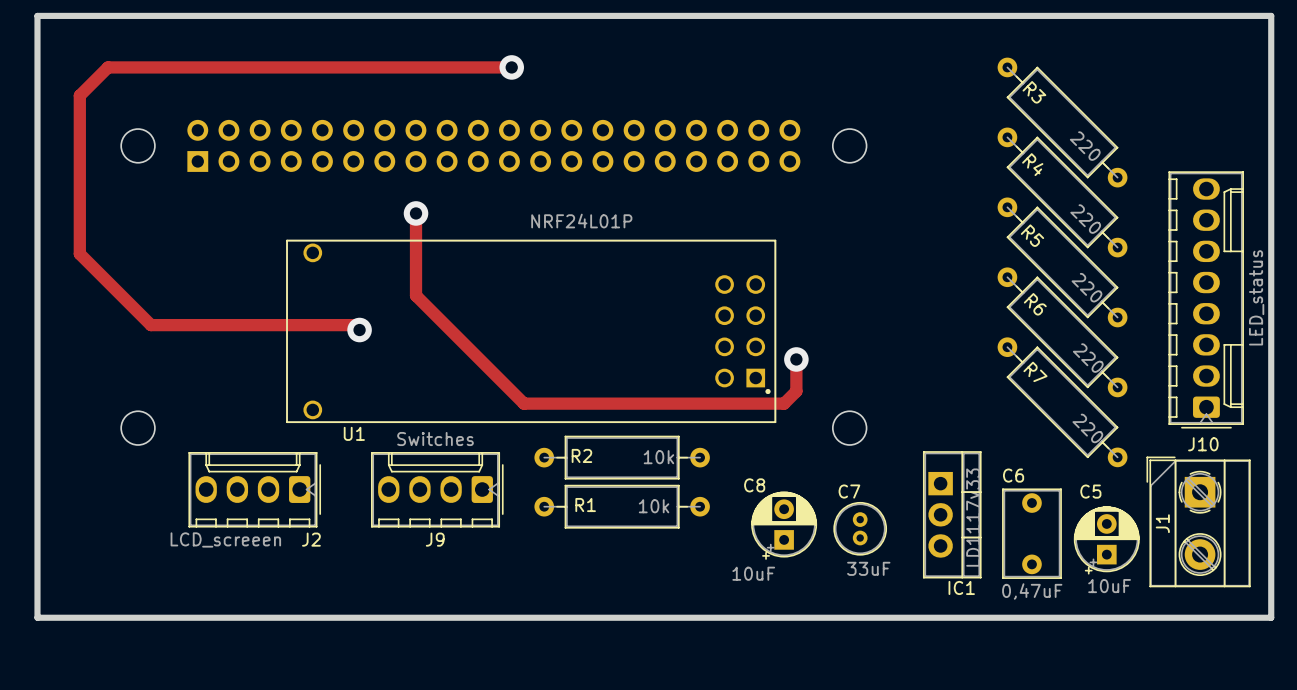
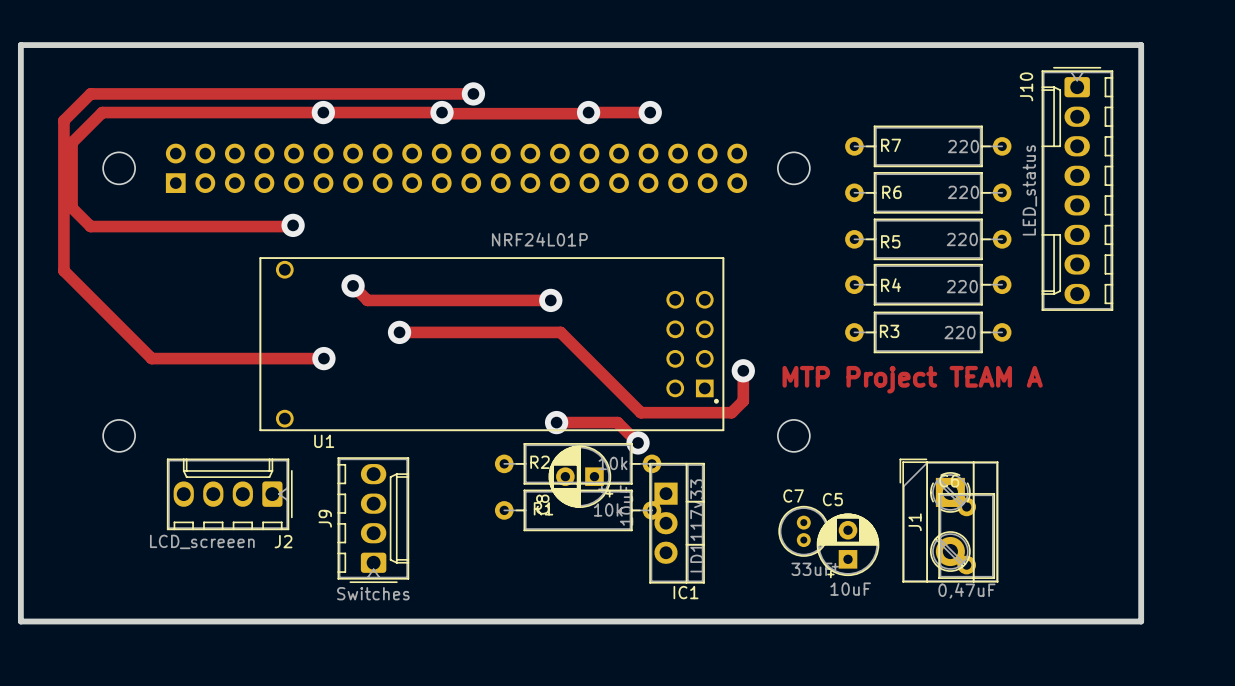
board edge: (37, 15) (37, 617) (1271, 617) (1271, 15) (1216, 15) -> (23, 45) (20, 45) (20, 621) (1141, 621) (1141, 45)
via: none -> (323, 112)
via: none -> (442, 112)
via: none -> (588, 112)
track: none -> (650, 112) (102, 112) (72, 142) (72, 207) (90, 226) (293, 225)
via: none -> (650, 112)
R3 rotation: 0° (1062, 122) -> 45° counterclockwise (928, 332)
R3 position: (1062, 122) -> (928, 332)
R4 rotation: 0° (1062, 192) -> 45° counterclockwise (928, 284)
R4 position: (1062, 192) -> (928, 284)
via: none -> (293, 225)
track: (416, 213) (416, 295) (523, 403) (688, 403) -> (399, 332) (560, 332) (640, 412)
via: (416, 213) -> none
R5 rotation: 0° (1062, 262) -> 45° counterclockwise (928, 239)
R5 position: (1062, 262) -> (928, 239)
track: none -> (353, 285) (367, 300) (550, 300)
via: none -> (353, 285)
via: none -> (550, 300)
J10 rotation: 0° (1206, 299) -> 180° (1077, 188)
via: none -> (399, 332)
track: (150, 325) (354, 325) (359, 330) -> (131, 338) (151, 358) (323, 358)
via position: (359, 330) -> (323, 358)
R6 rotation: 0° (1062, 332) -> 45° counterclockwise (928, 192)
R6 position: (1062, 332) -> (928, 192)
text: none -> MTP Project TEAM A (912, 379)
R7 rotation: 0° (1062, 402) -> 45° counterclockwise (928, 146)
R7 position: (1062, 402) -> (928, 146)
track: none -> (556, 422) (617, 422) (638, 442)
via: none -> (556, 422)
via: none -> (638, 442)
J9 value position: Switches (435, 439) -> Switches (373, 593)
J10 name position: J10 (1203, 444) -> J10 (1026, 86)
J9 rotation: 0° (437, 489) -> 90° clockwise (373, 520)
IC1 position: (952, 514) -> (677, 523)
J1 position: (1198, 521) -> (948, 520)
C8 rotation: 0° (784, 525) -> 90° counterclockwise (581, 476)
C8 position: (784, 525) -> (581, 476)
C5 position: (1106, 540) -> (848, 545)

